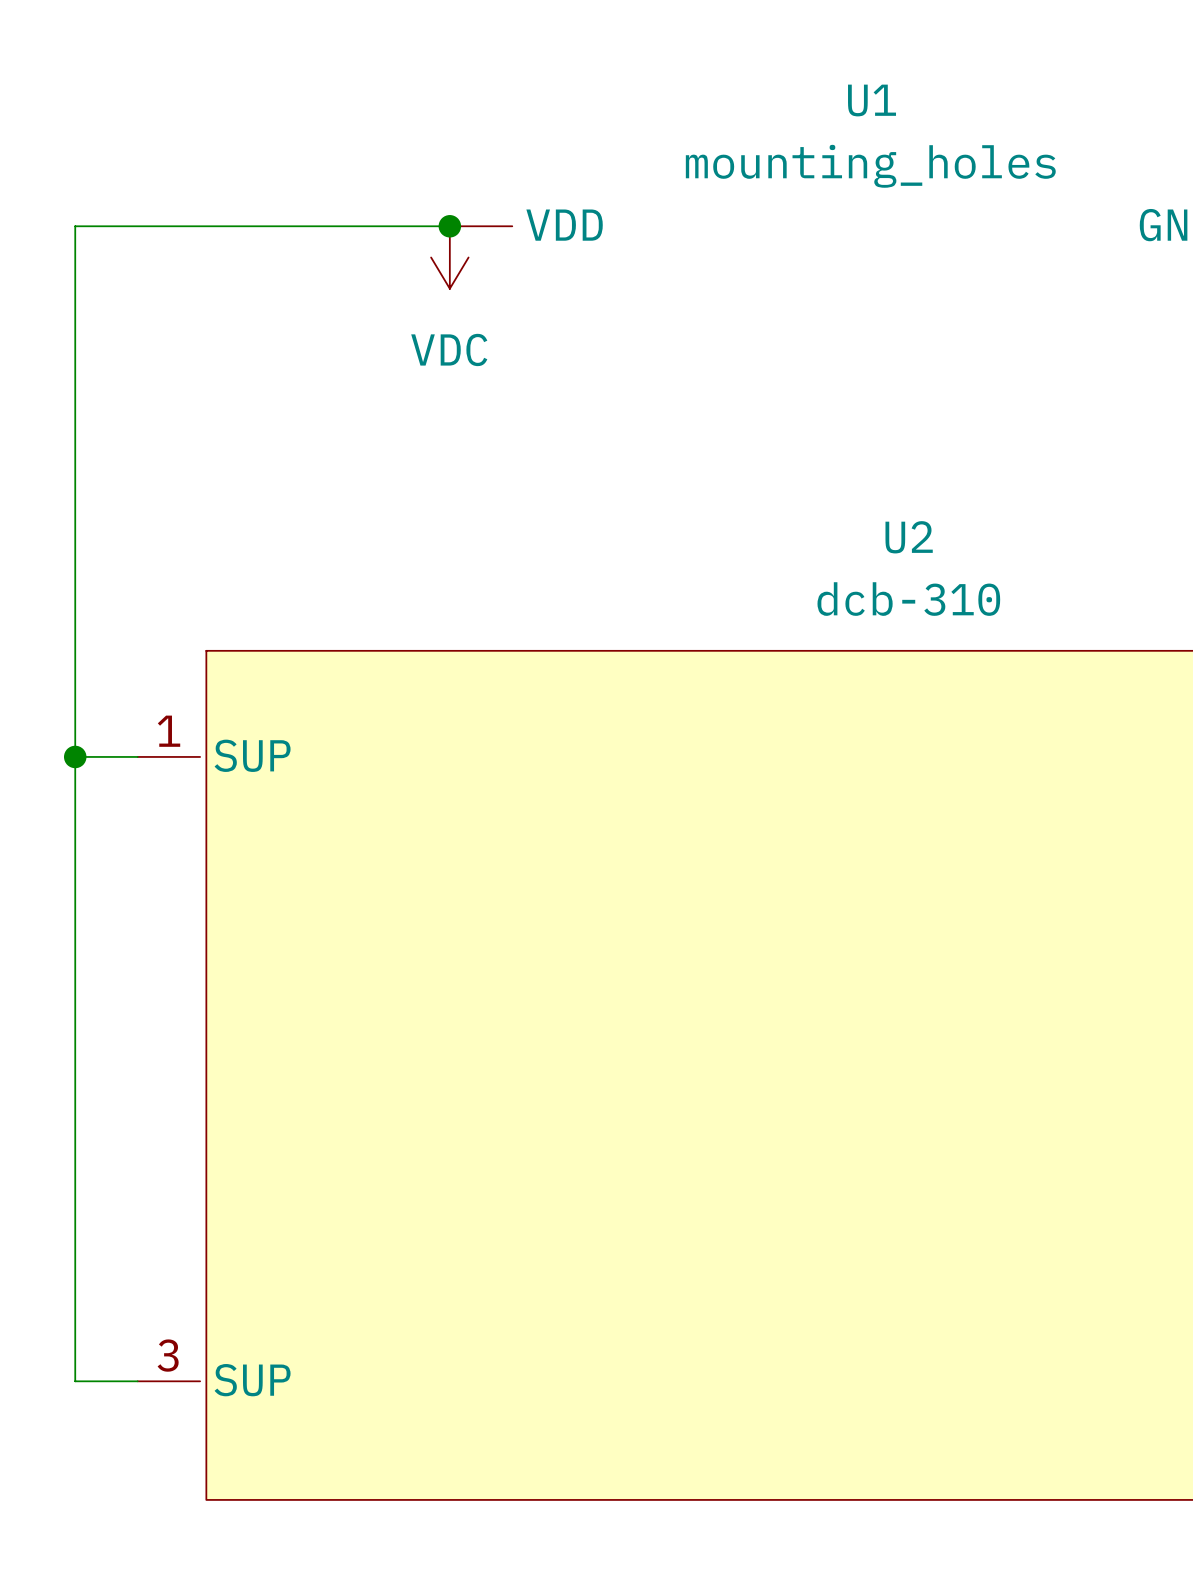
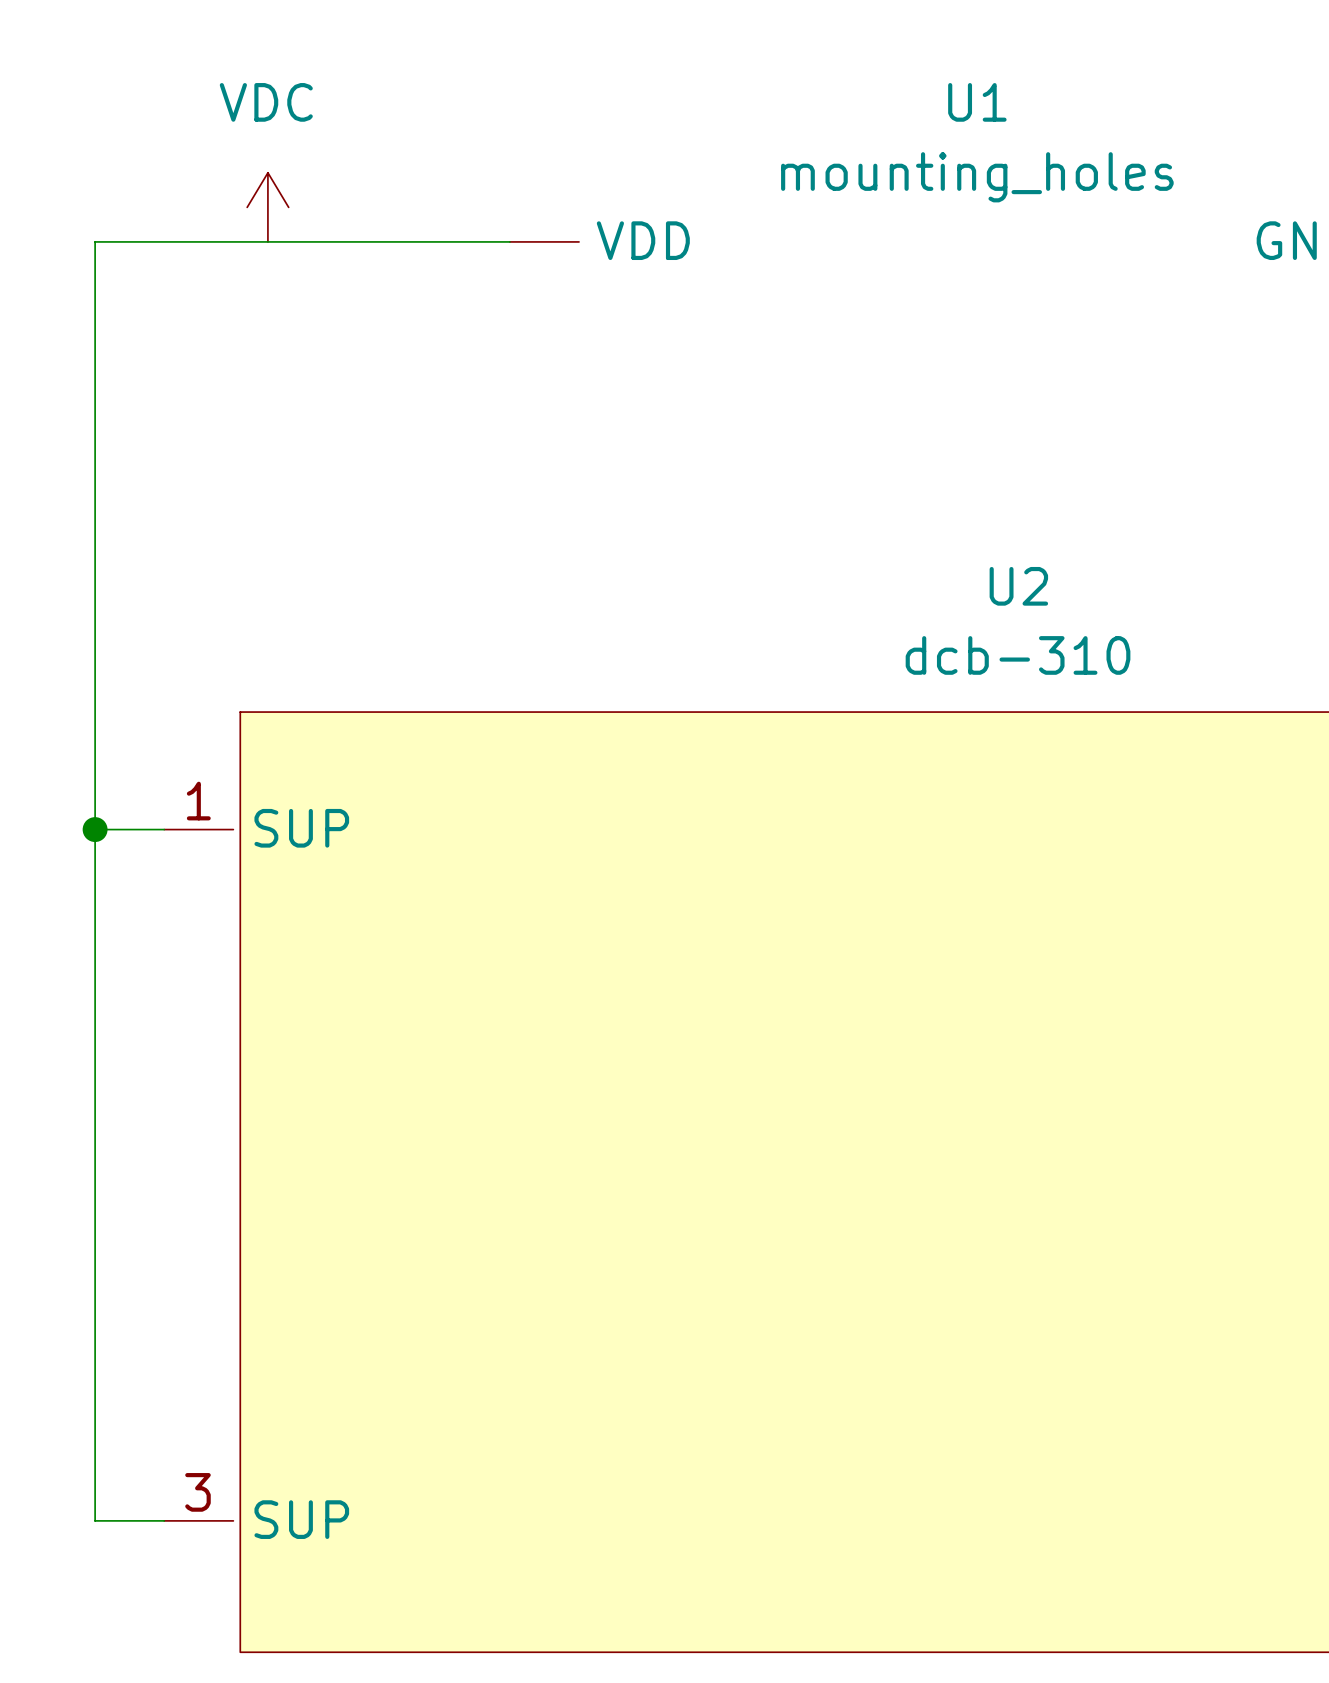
junction: (449, 226) -> none
power symbol rotation: 0° (449, 257) -> 180° (267, 207)
power symbol position: VDC (449, 257) -> VDC (267, 207)

